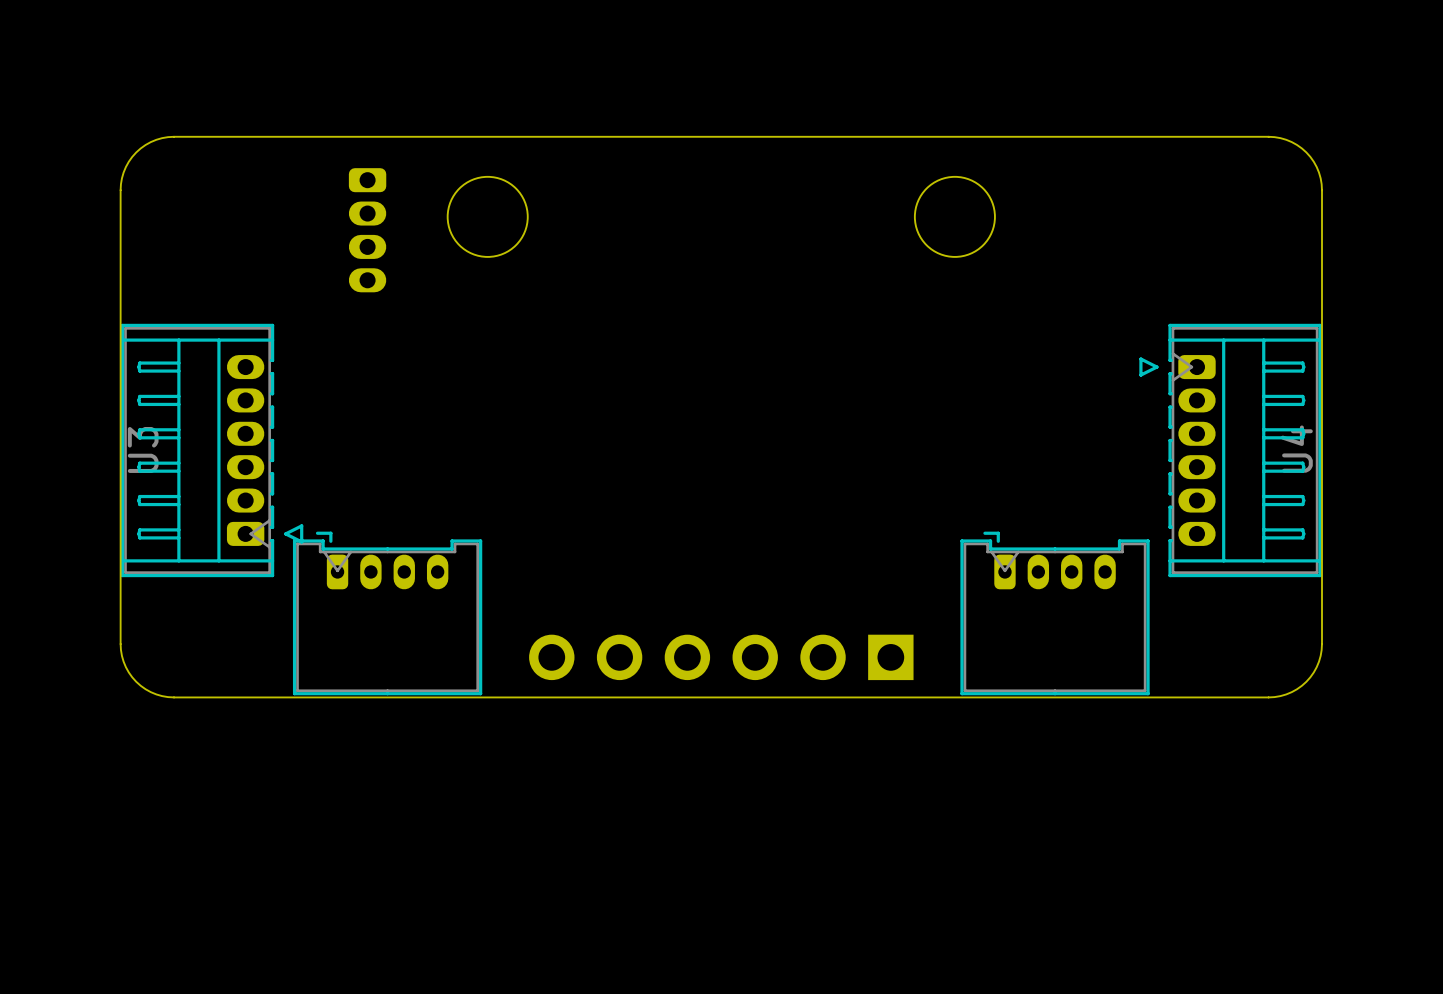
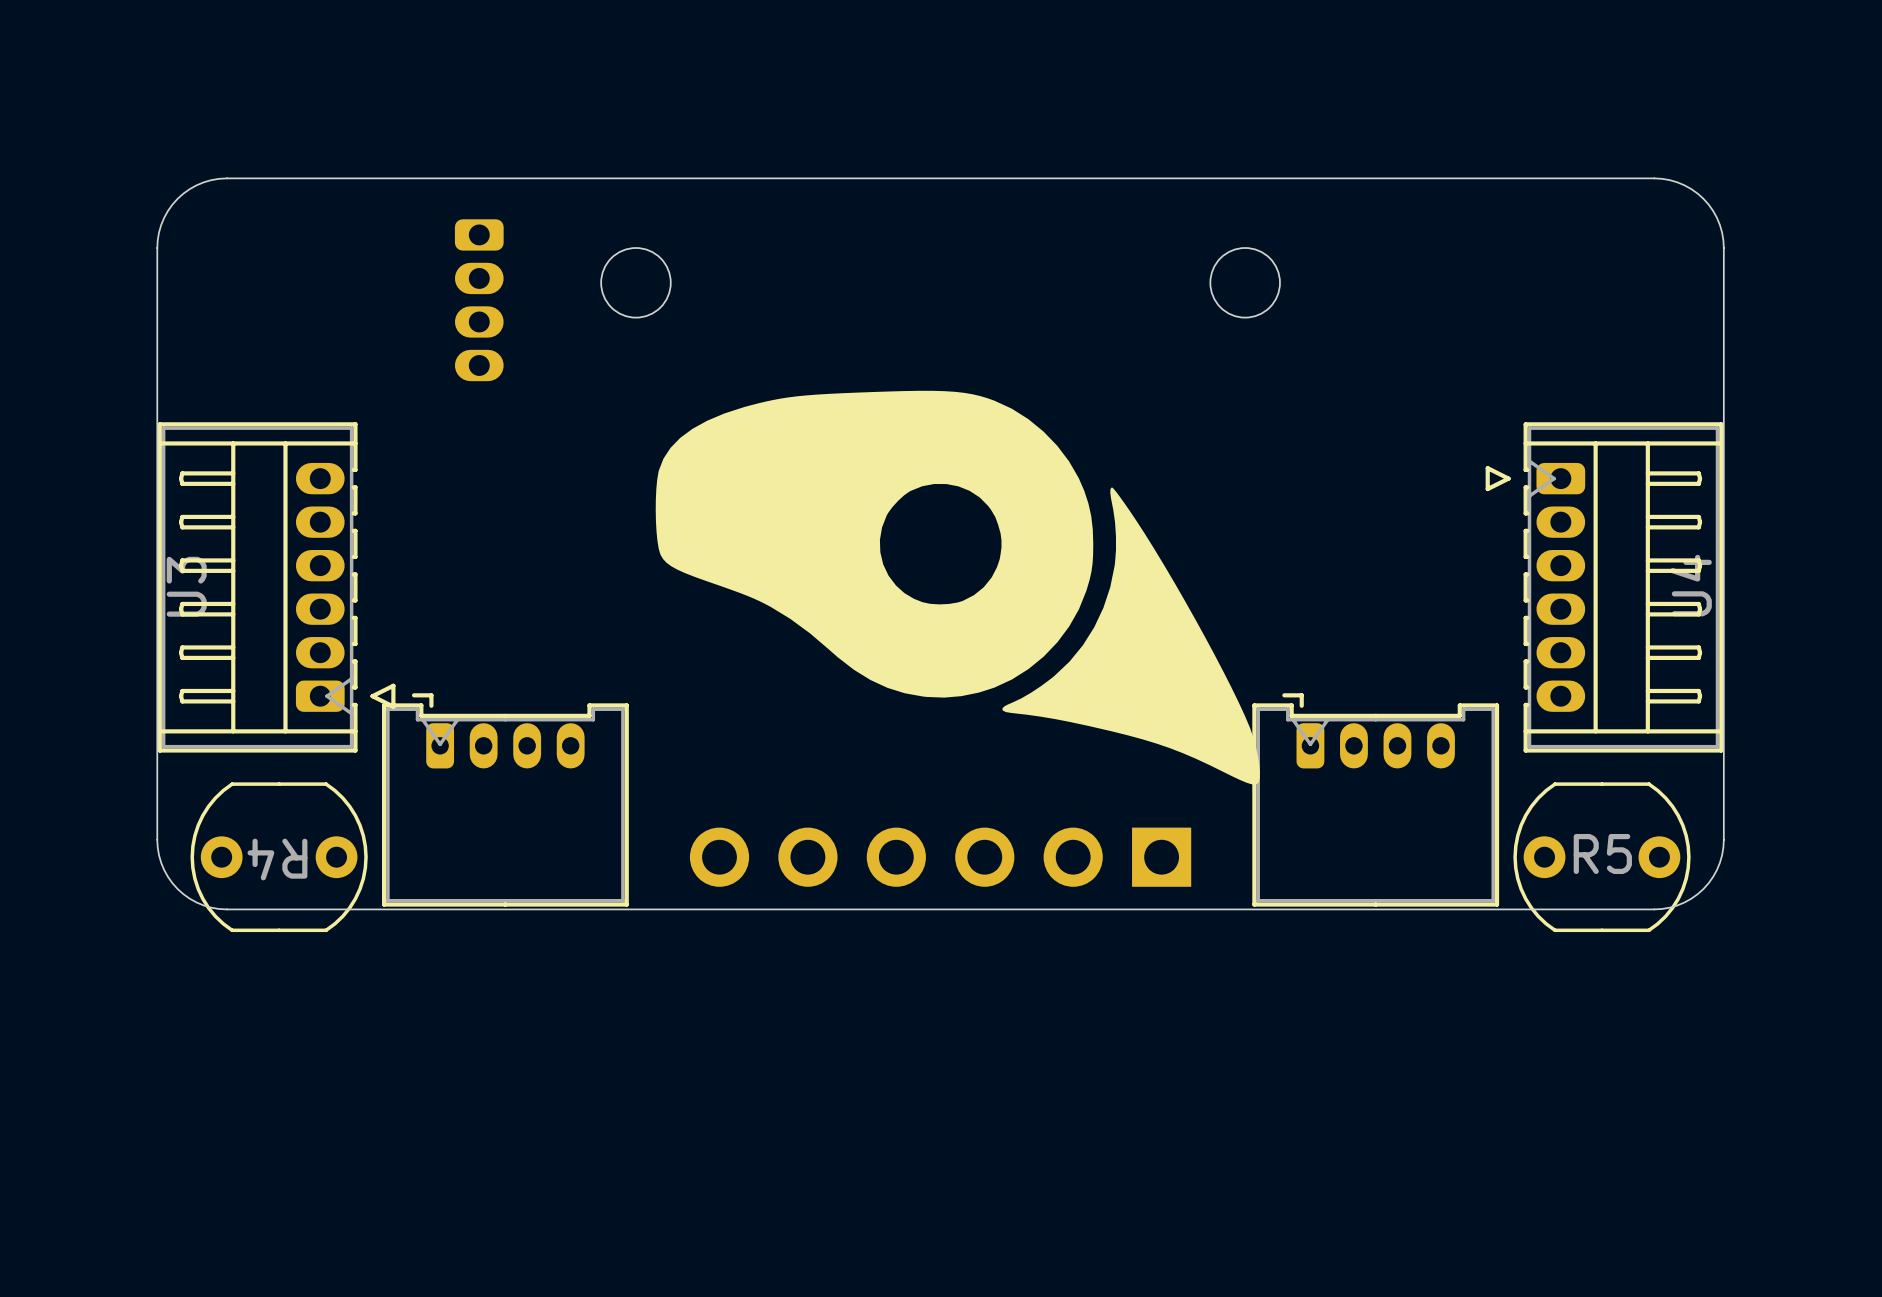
round board edge size: [446, 176, 529, 258] -> [600, 247, 672, 319]
round board edge size: [914, 176, 996, 258] -> [1209, 247, 1281, 319]
drawing: none -> [655, 390, 1260, 785]
R4: none -> (279, 857)
R5: none -> (1601, 857)

